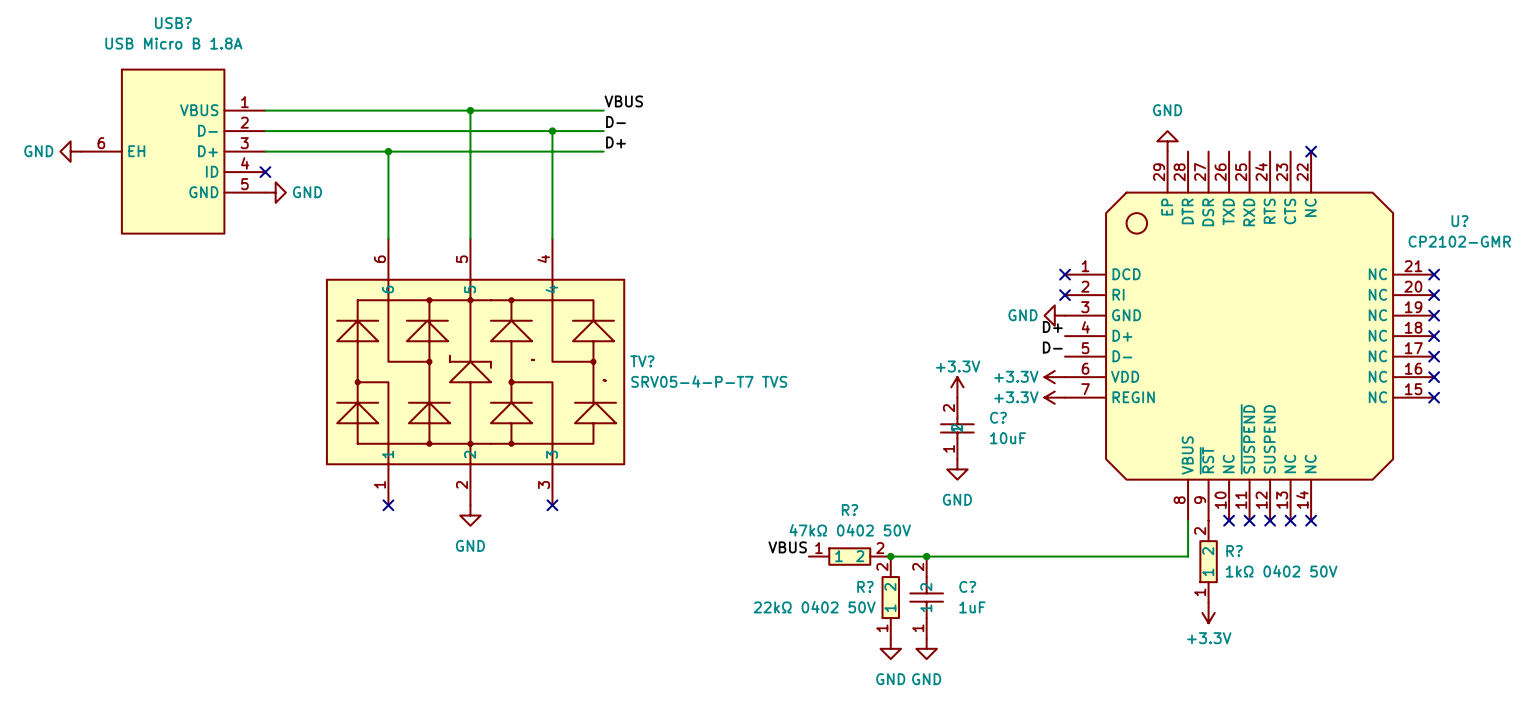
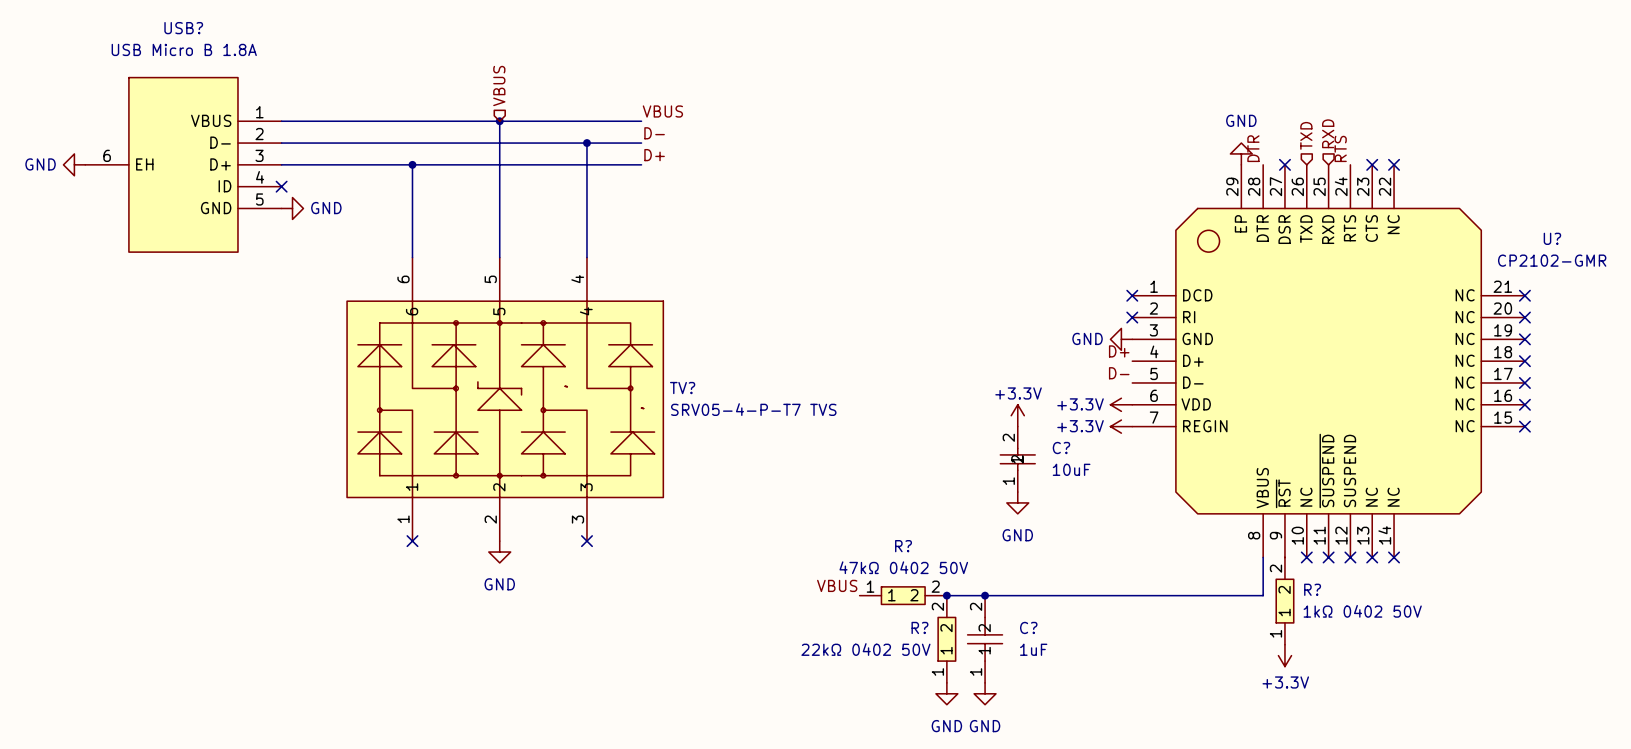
hierarchical label: none -> VBUS (499, 86)
hierarchical label: none -> RXD (1328, 133)
hierarchical label: none -> TXD (1306, 135)
label: none -> DTR (1253, 148)
label: none -> RTS (1340, 148)
no-connect mark: none -> (1284, 164)
no-connect mark: none -> (1372, 164)

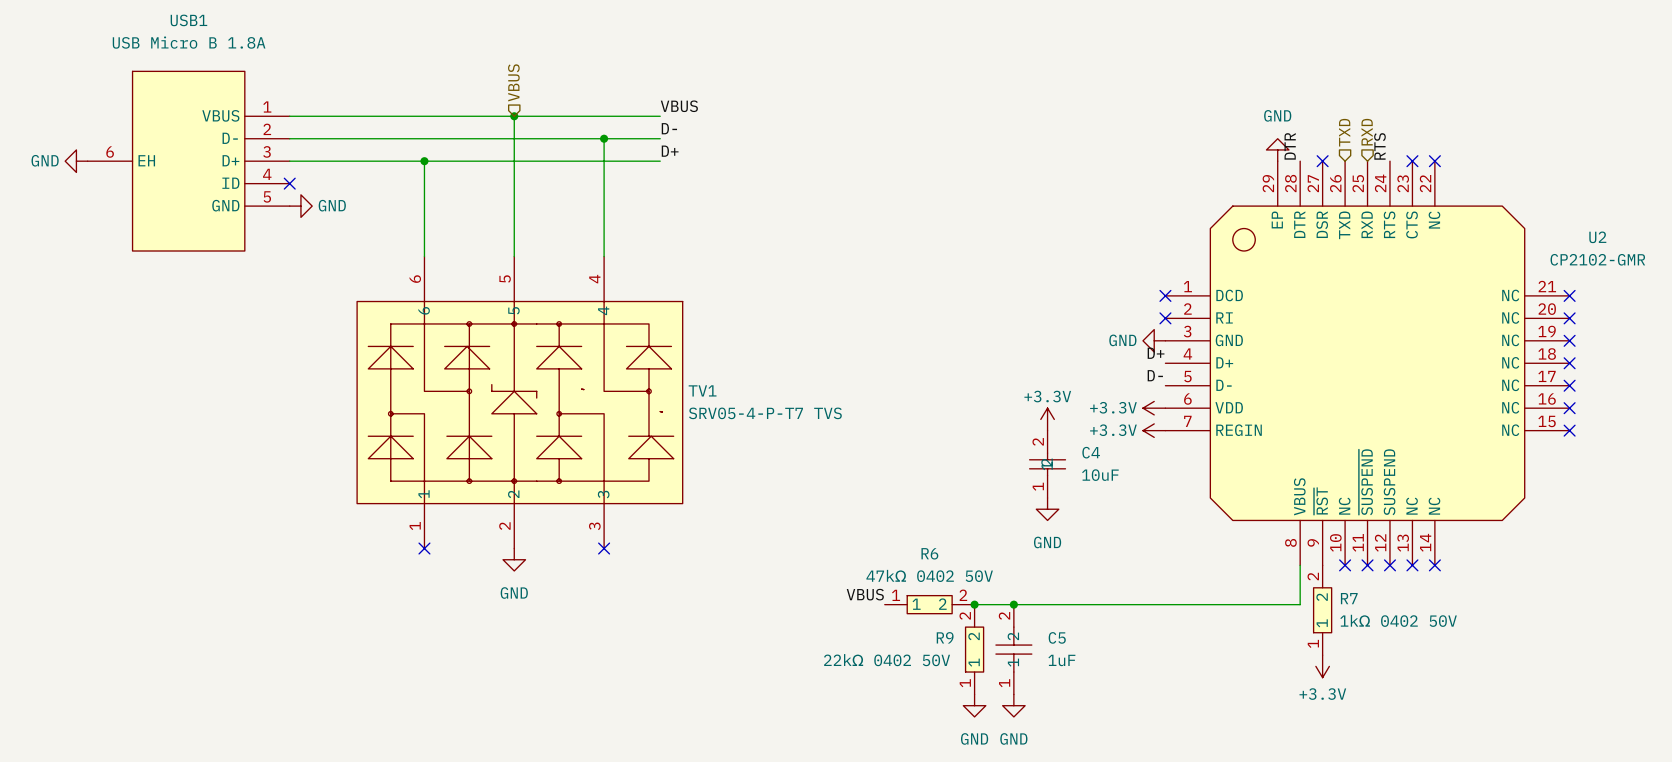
USB? name: USB? (183, 28) -> USB1 (188, 20)
U? name: U? (1552, 238) -> U2 (1597, 237)
TV? name: TV? (682, 388) -> TV1 (702, 390)
C? name: C? (1061, 448) -> C4 (1091, 452)
R? name: R? (903, 546) -> R6 (929, 553)
R? name: R? (1312, 589) -> R7 (1349, 598)
R? name: R? (919, 627) -> R9 (945, 637)
C? name: C? (1028, 627) -> C5 (1057, 637)

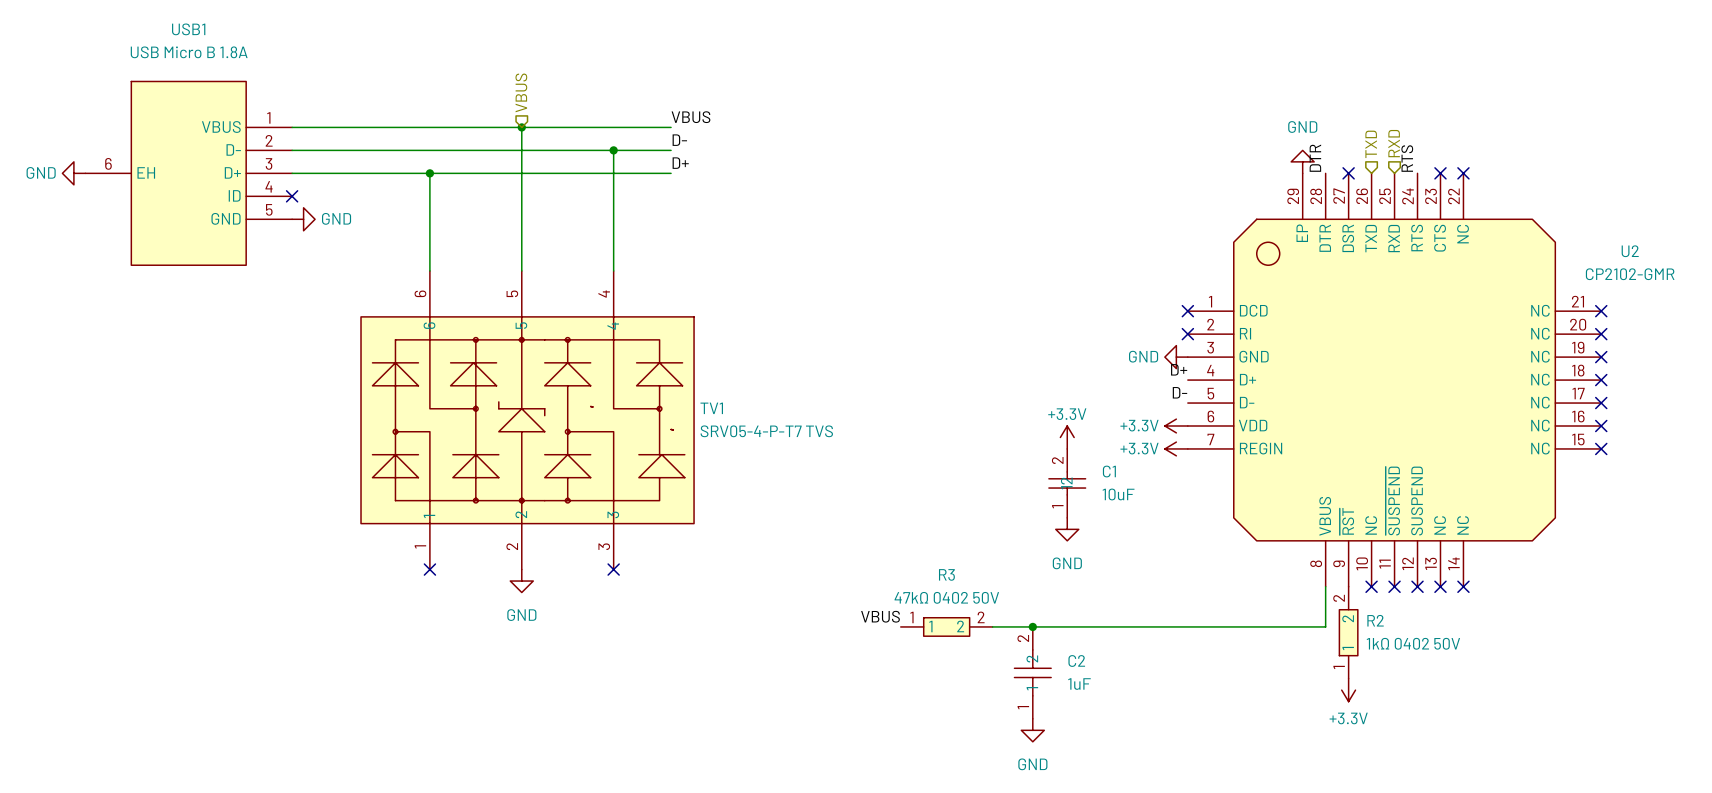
C4 name: C4 (1091, 452) -> C1 (1109, 471)
R6 name: R6 (929, 553) -> R3 (946, 574)
R7 name: R7 (1349, 598) -> R2 (1375, 620)
junction: (974, 604) -> none
C5 name: C5 (1057, 637) -> C2 (1076, 660)
R9: 22kΩ 0402 50V (974, 649) -> none
power symbol: GND (974, 705) -> none

